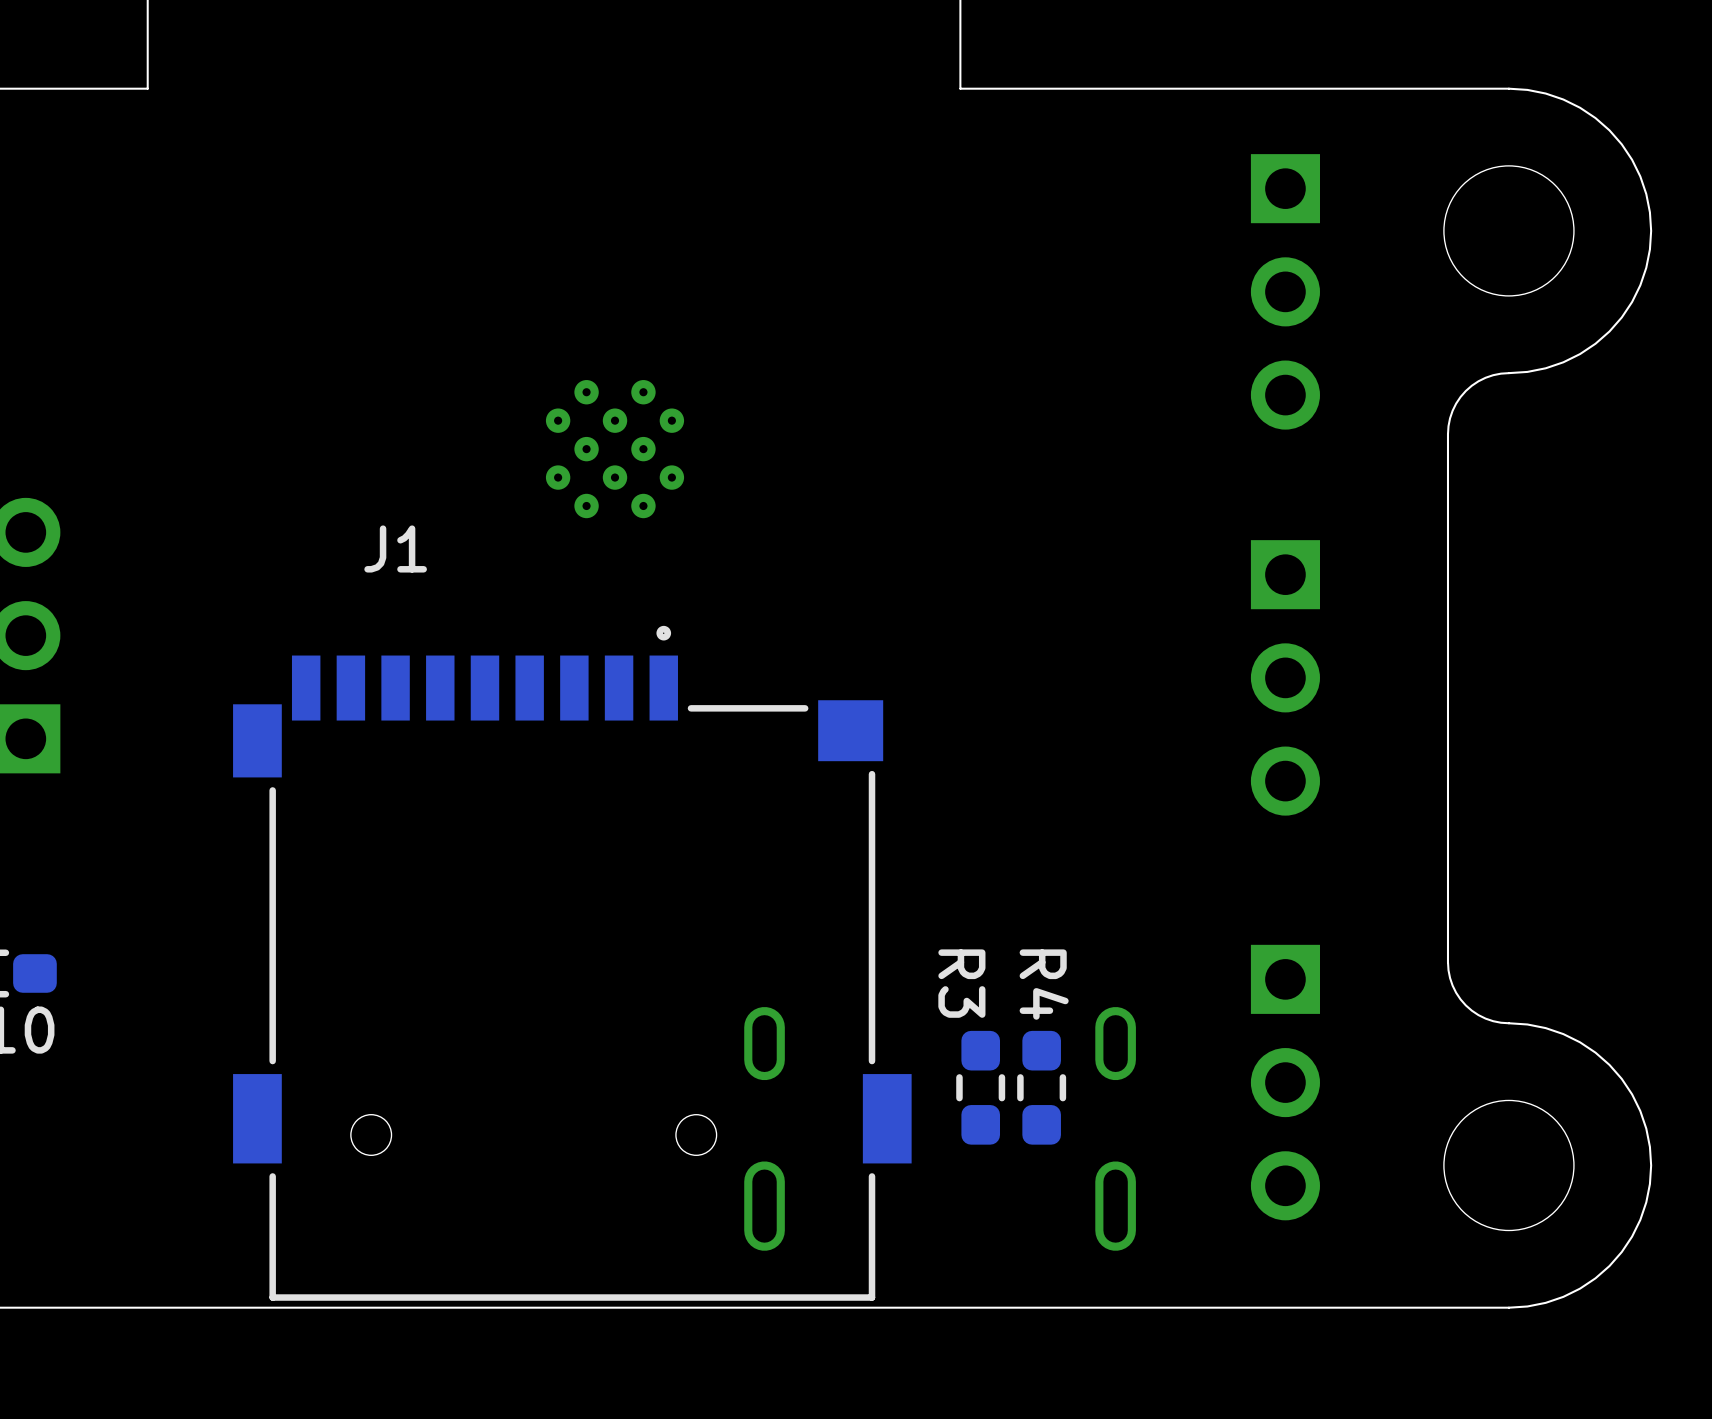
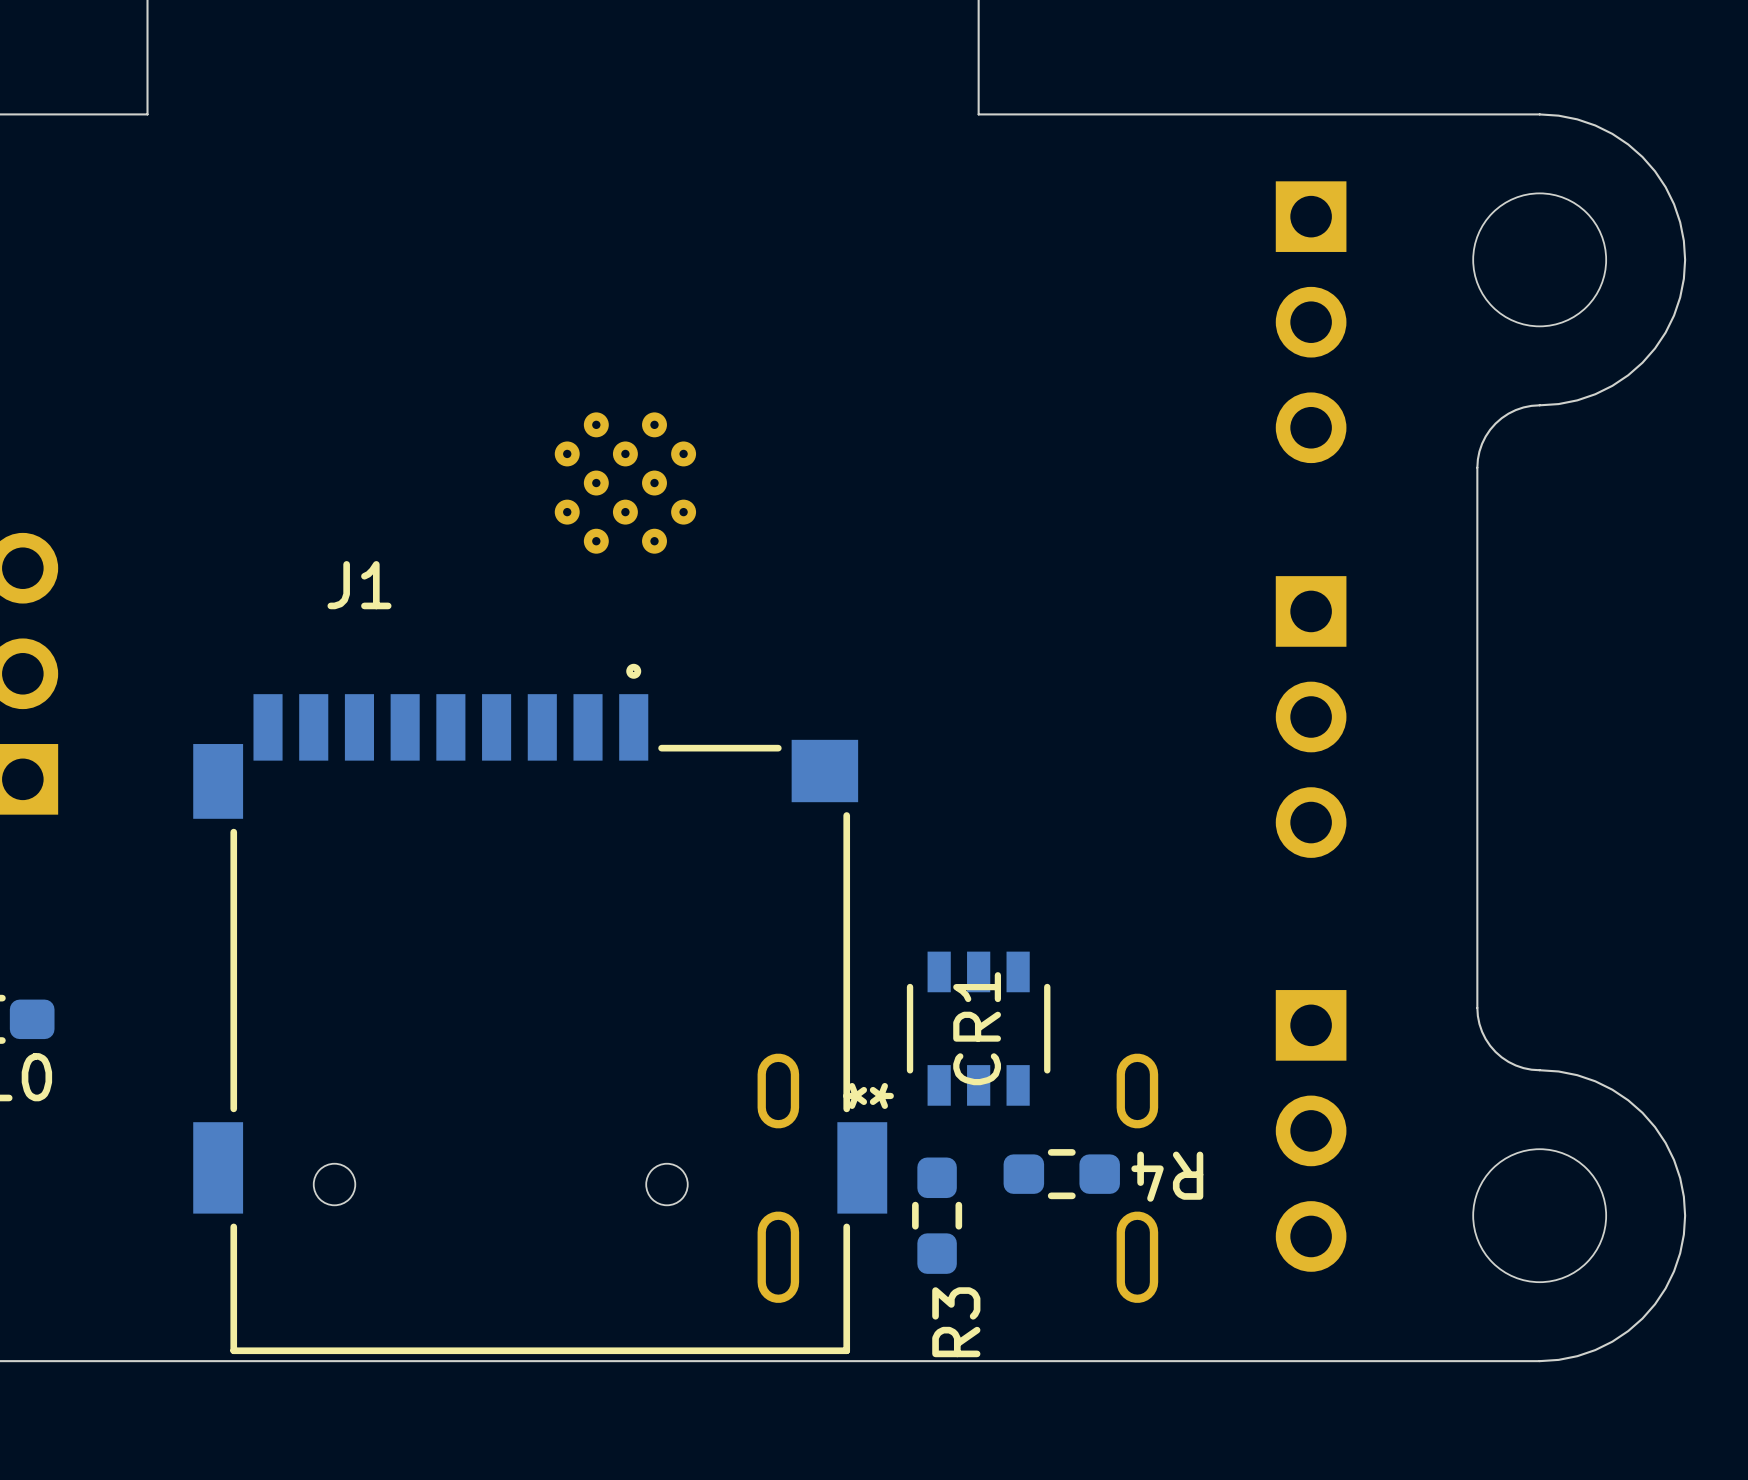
J1 position: (572, 963) -> (540, 1008)
CR1: none -> (978, 1028)
R3 name rotation: 0° (961, 983) -> 180° (956, 1322)
R3 name position: R3 (961, 983) -> R3 (956, 1322)
R3 position: (980, 1087) -> (937, 1215)
R4 rotation: 0° (1041, 1087) -> 90° clockwise (1061, 1174)

